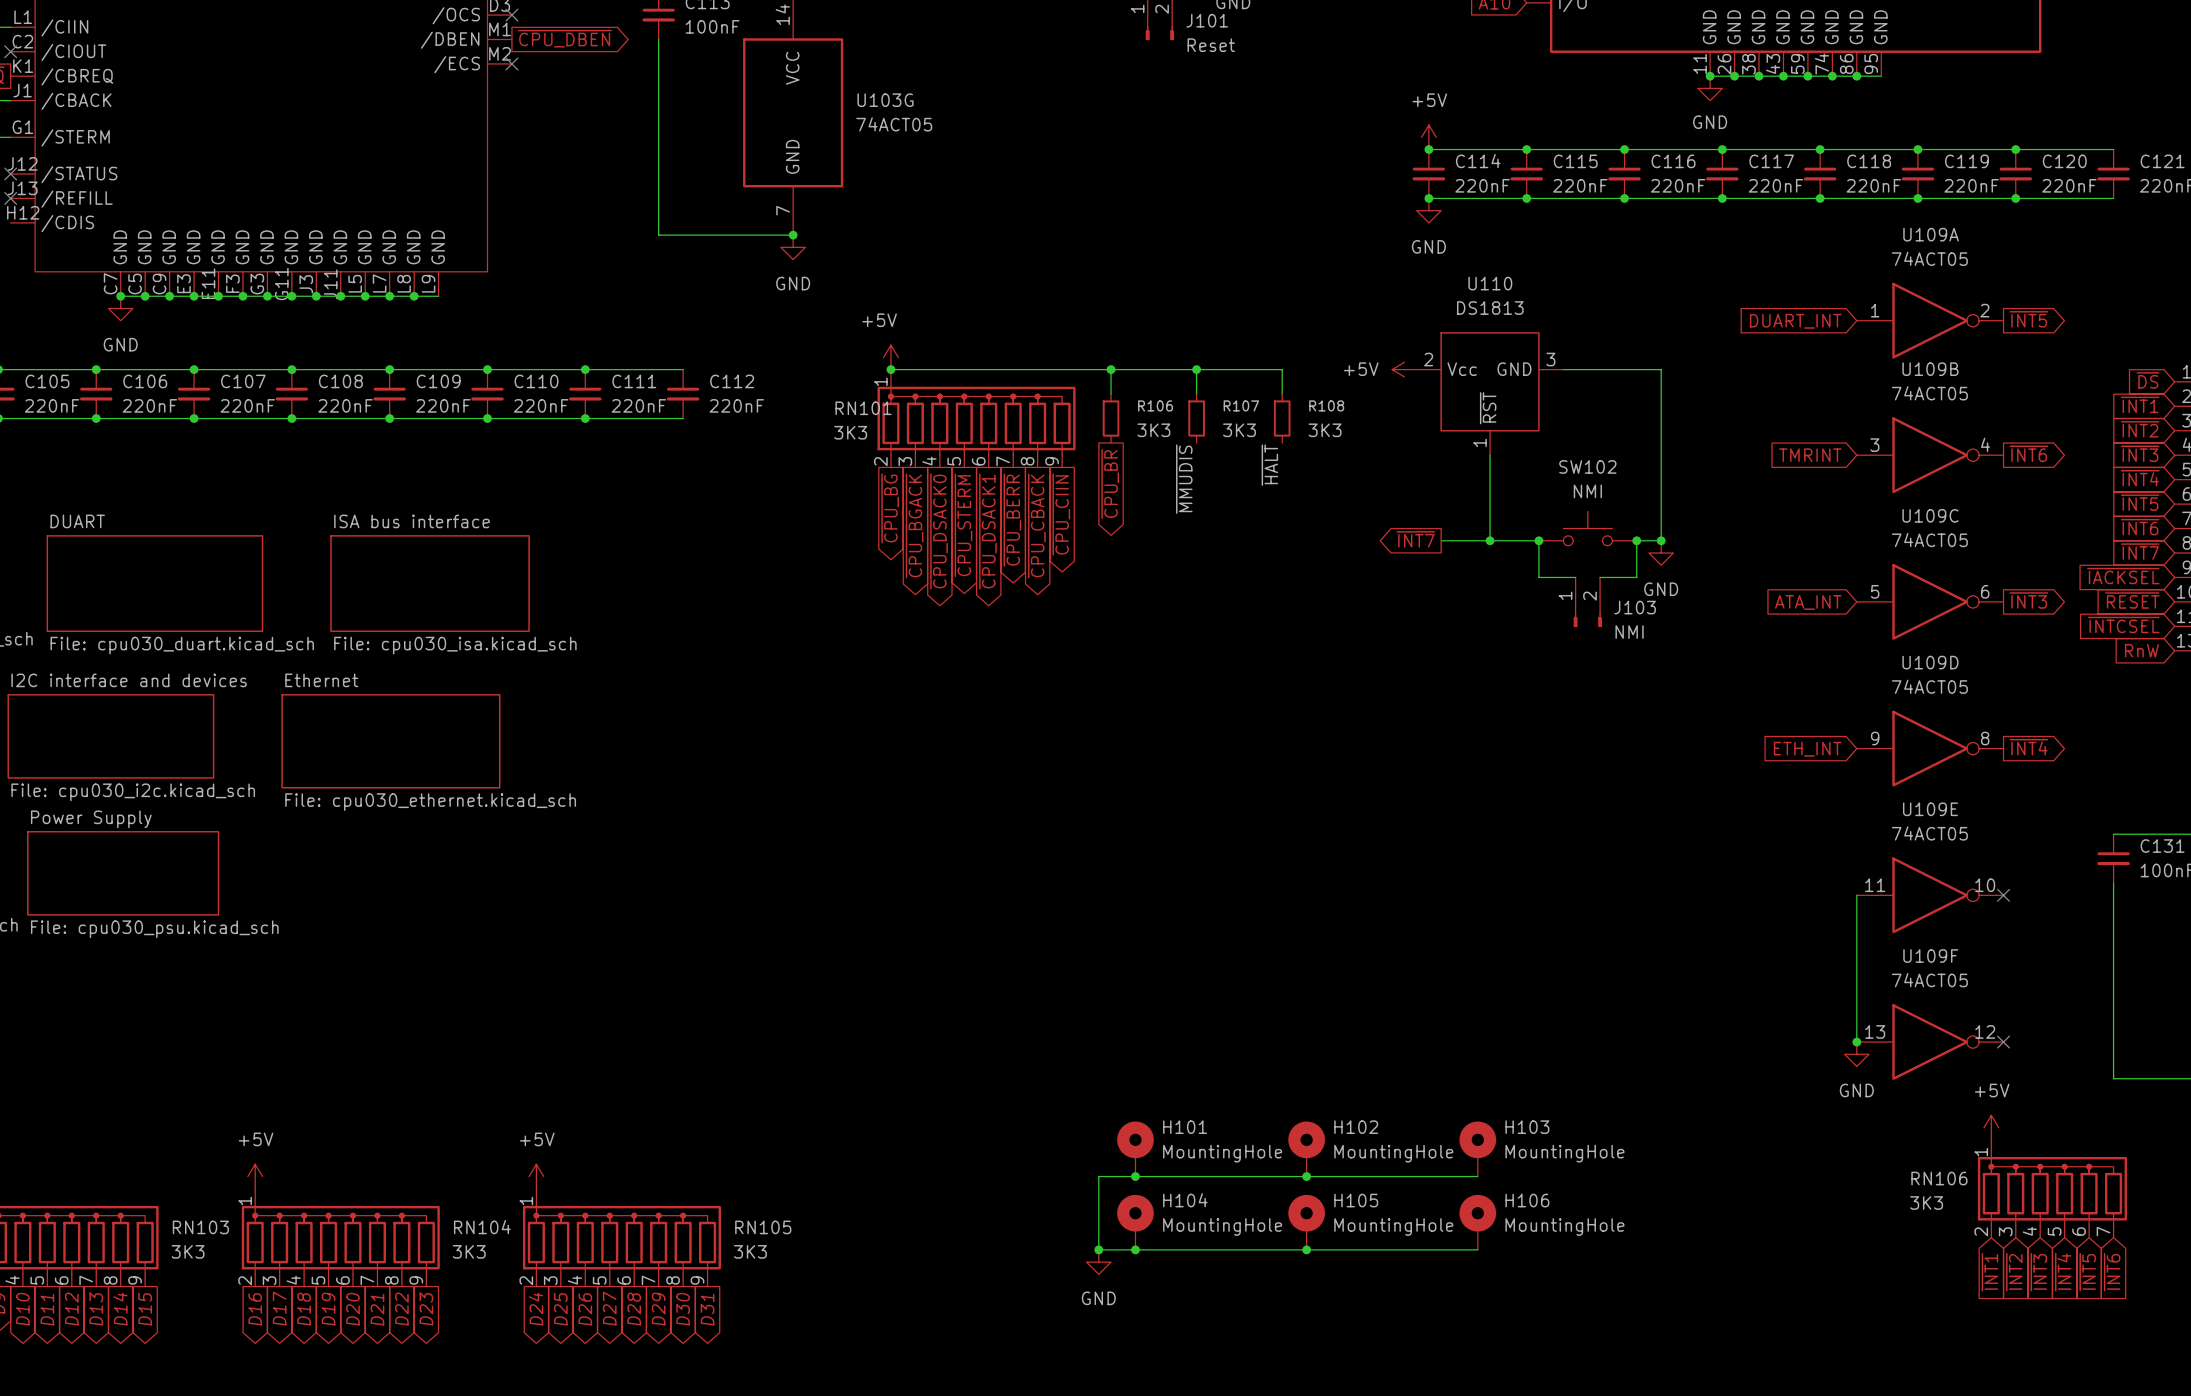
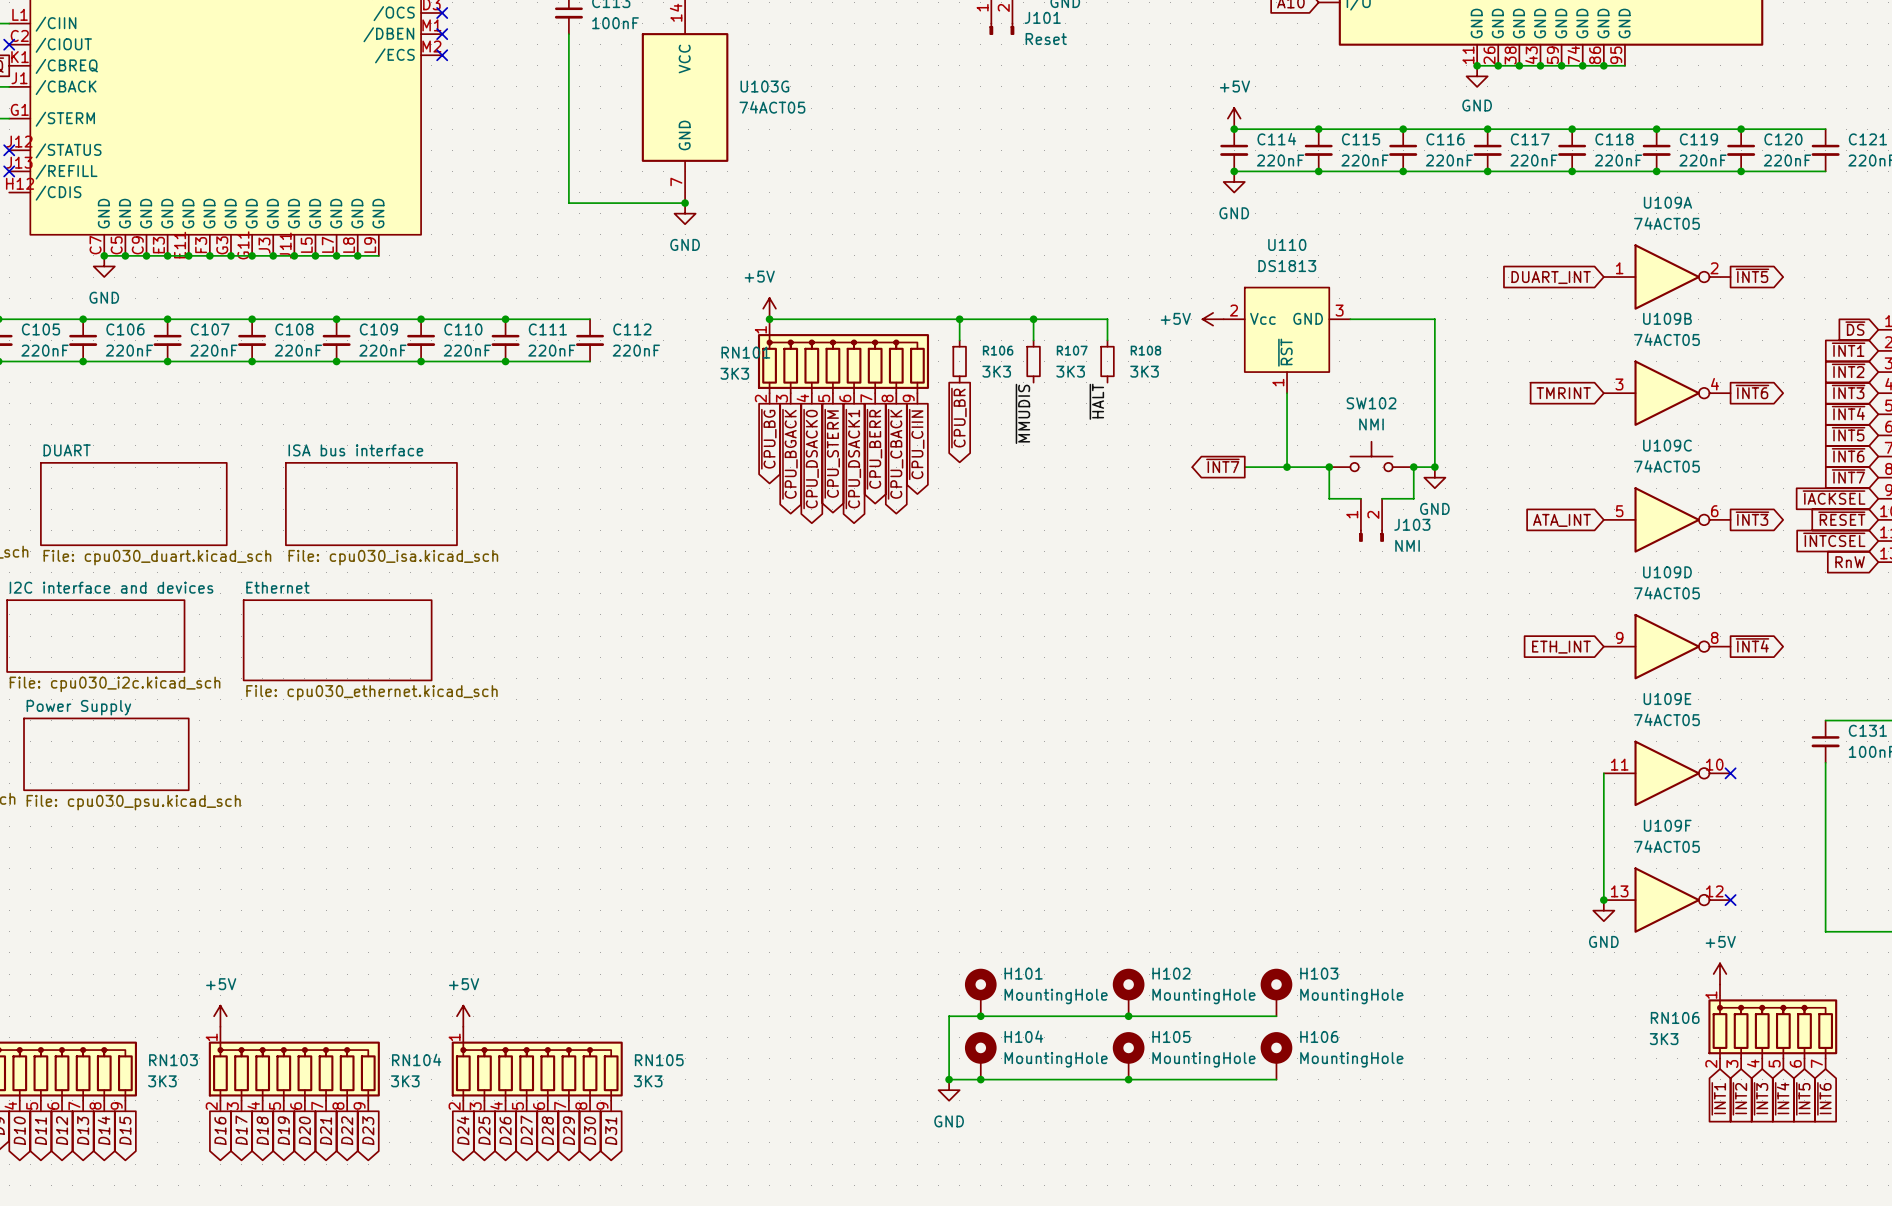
global label: ~{CPU_DBEN} (564, 38) -> none
no-connect mark: none -> (442, 34)

